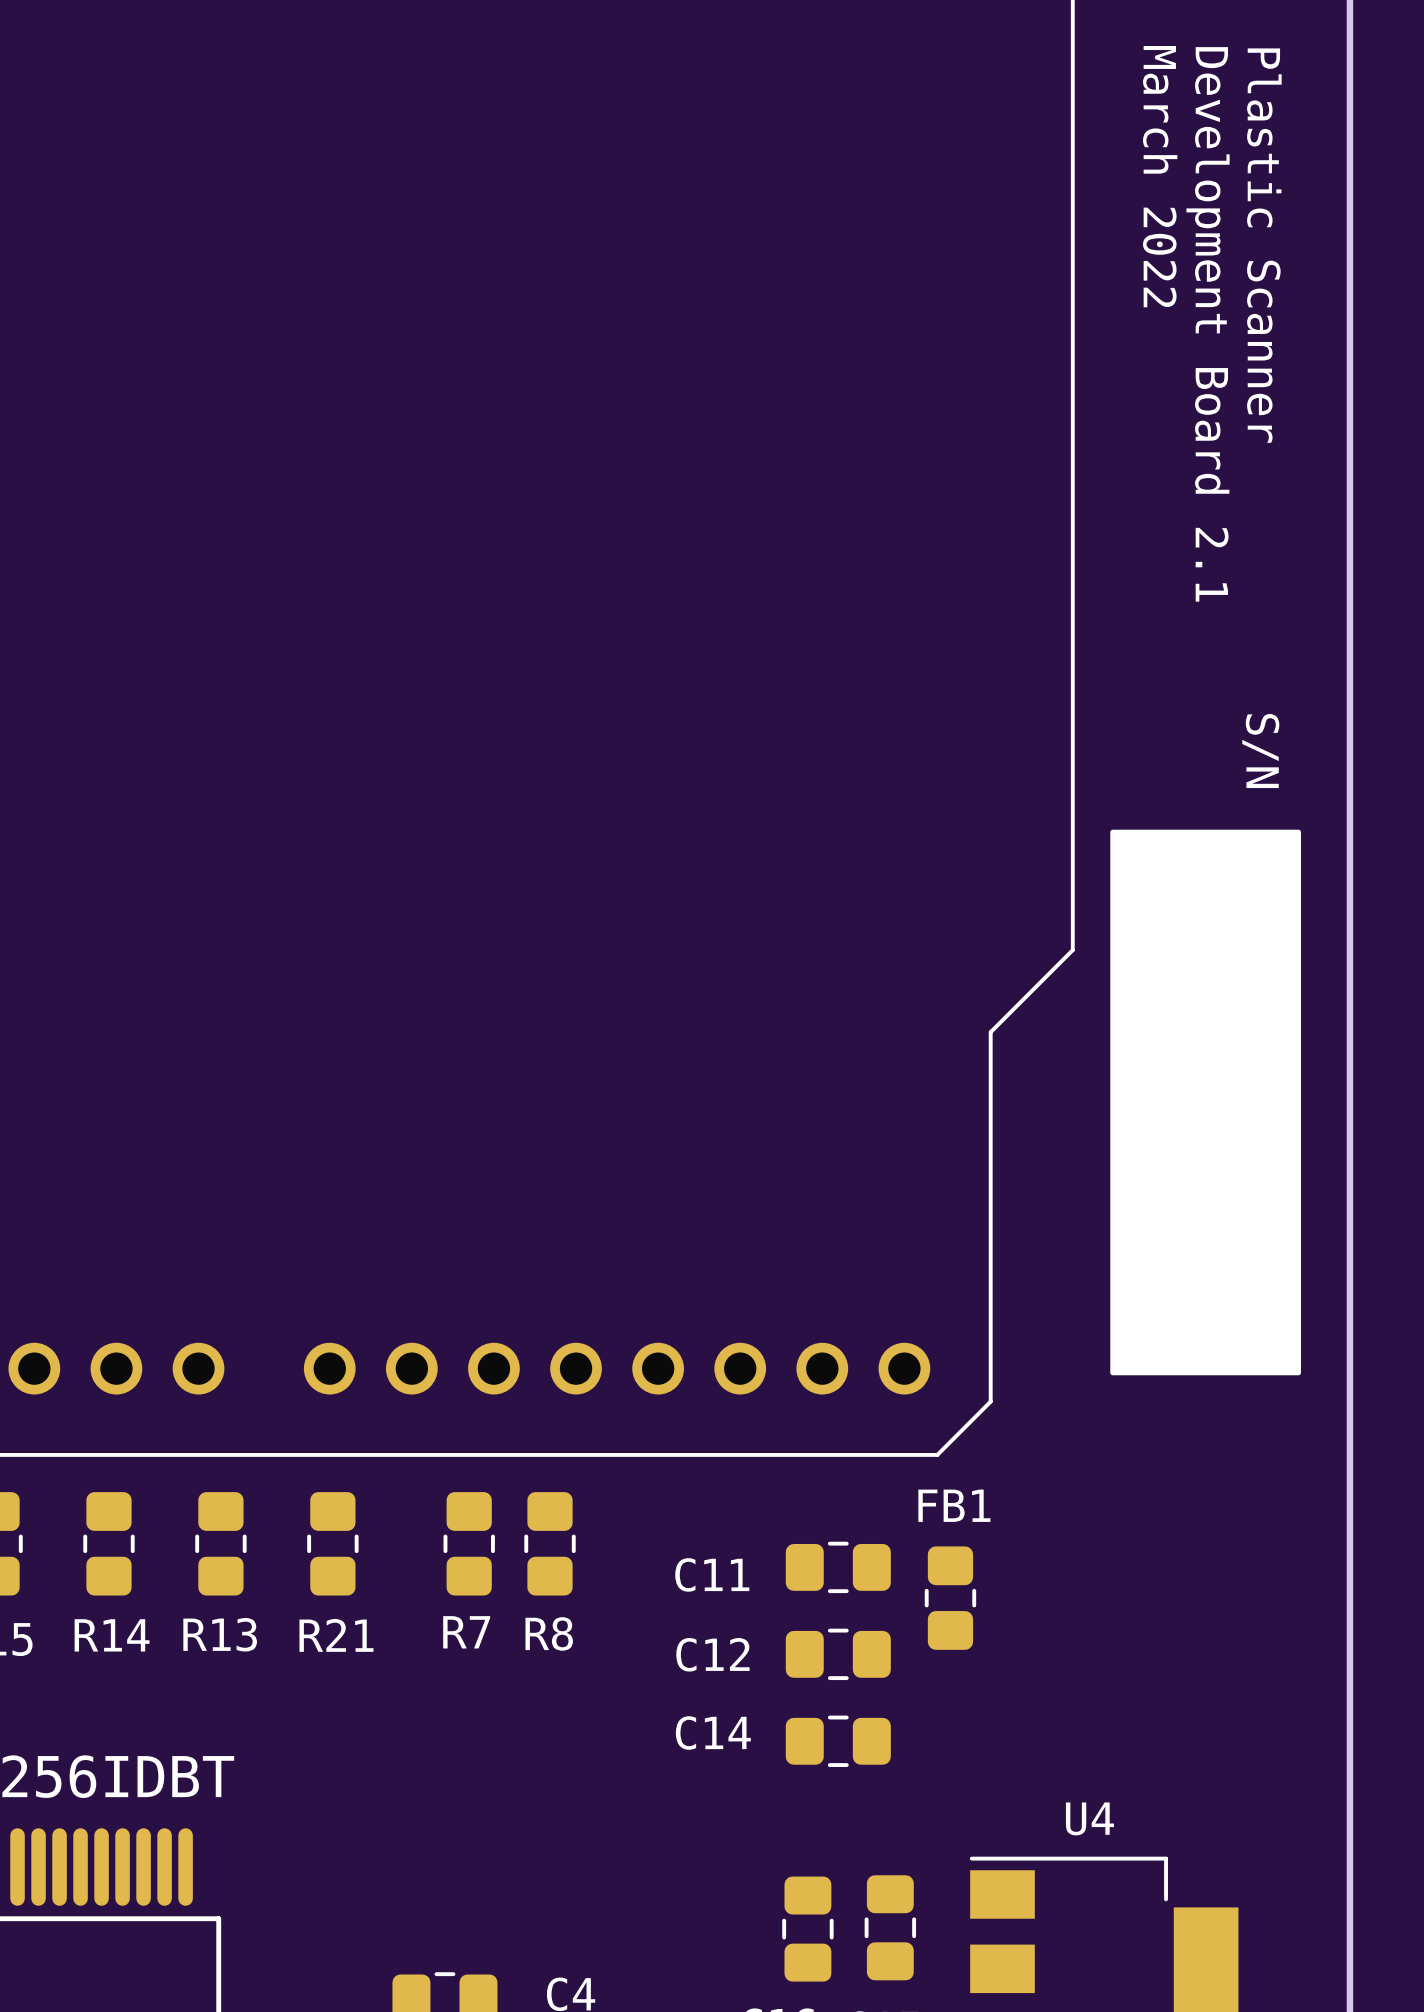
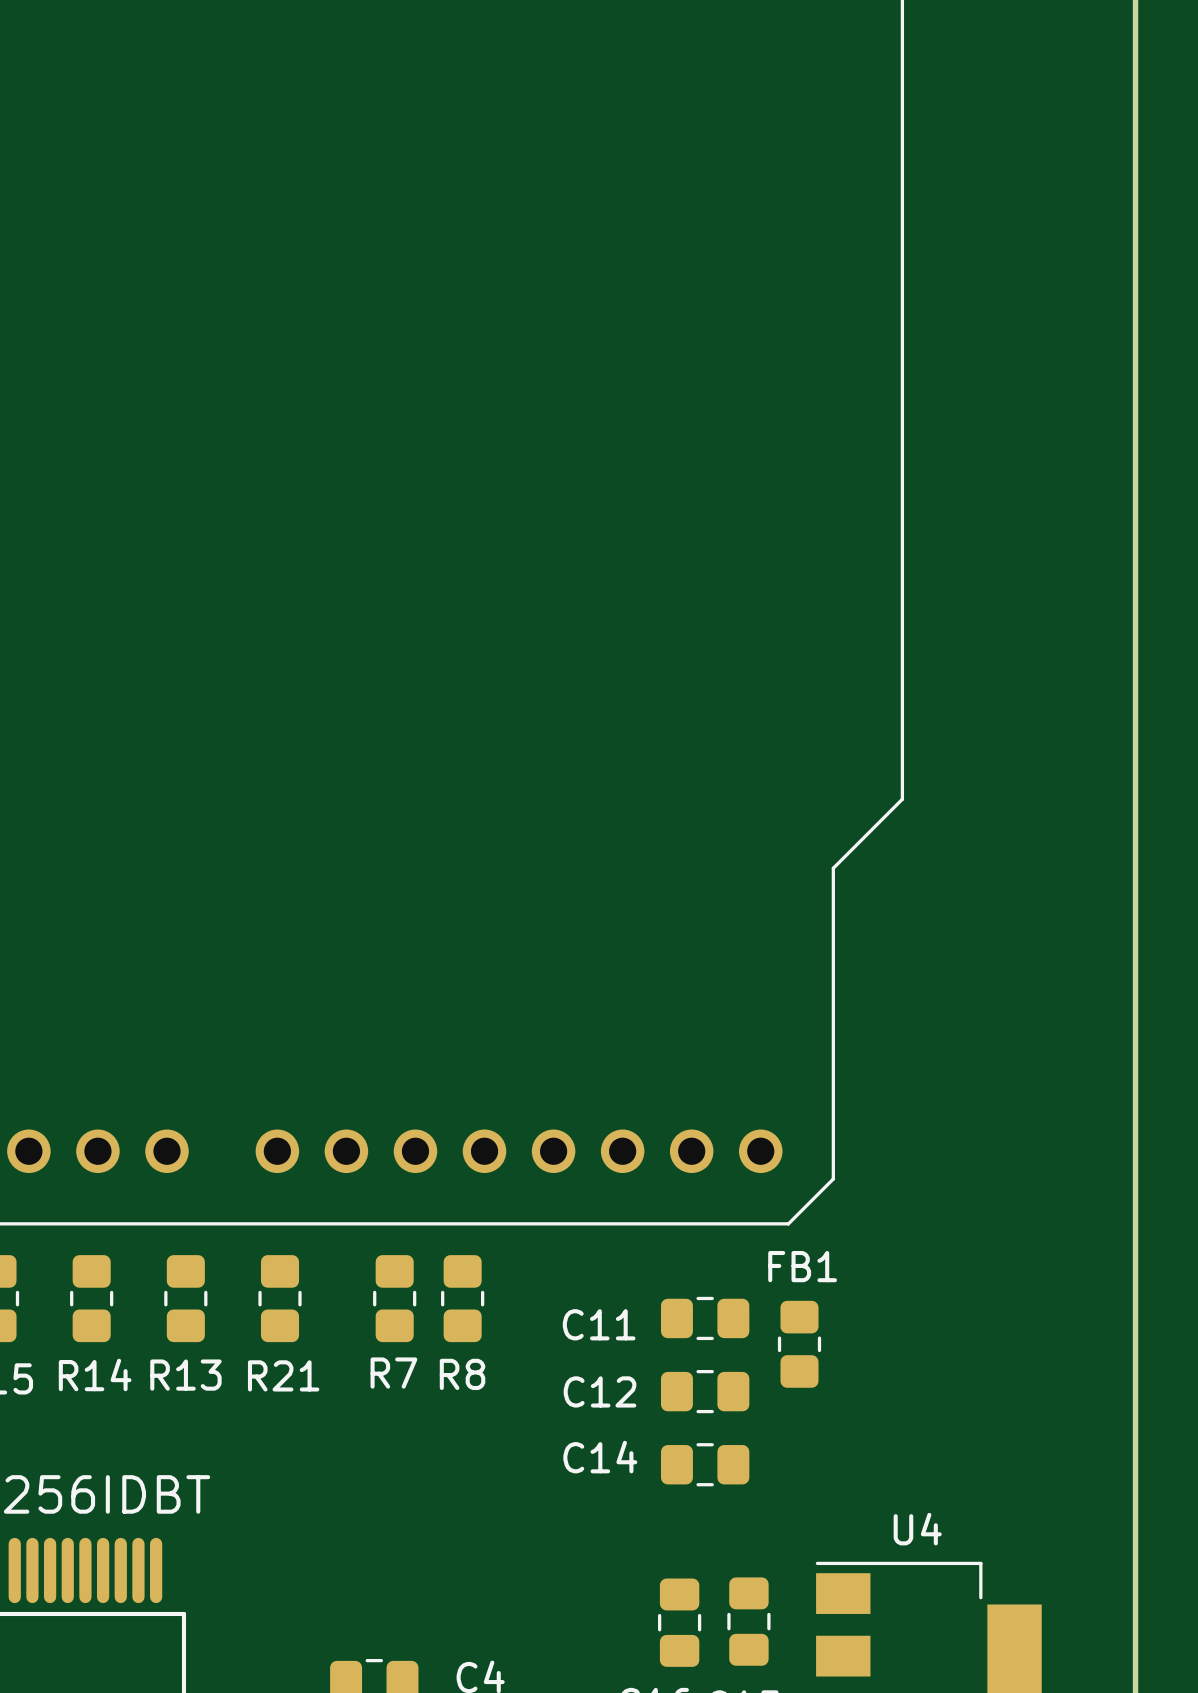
text: March 2022 (1160, 176) -> none
text: Plastic Scanner (1264, 245) -> none
text: Development Board 2.1 (1208, 324) -> none
text: S/N (1260, 751) -> none
drawing: [1110, 829, 1301, 1376] -> none

